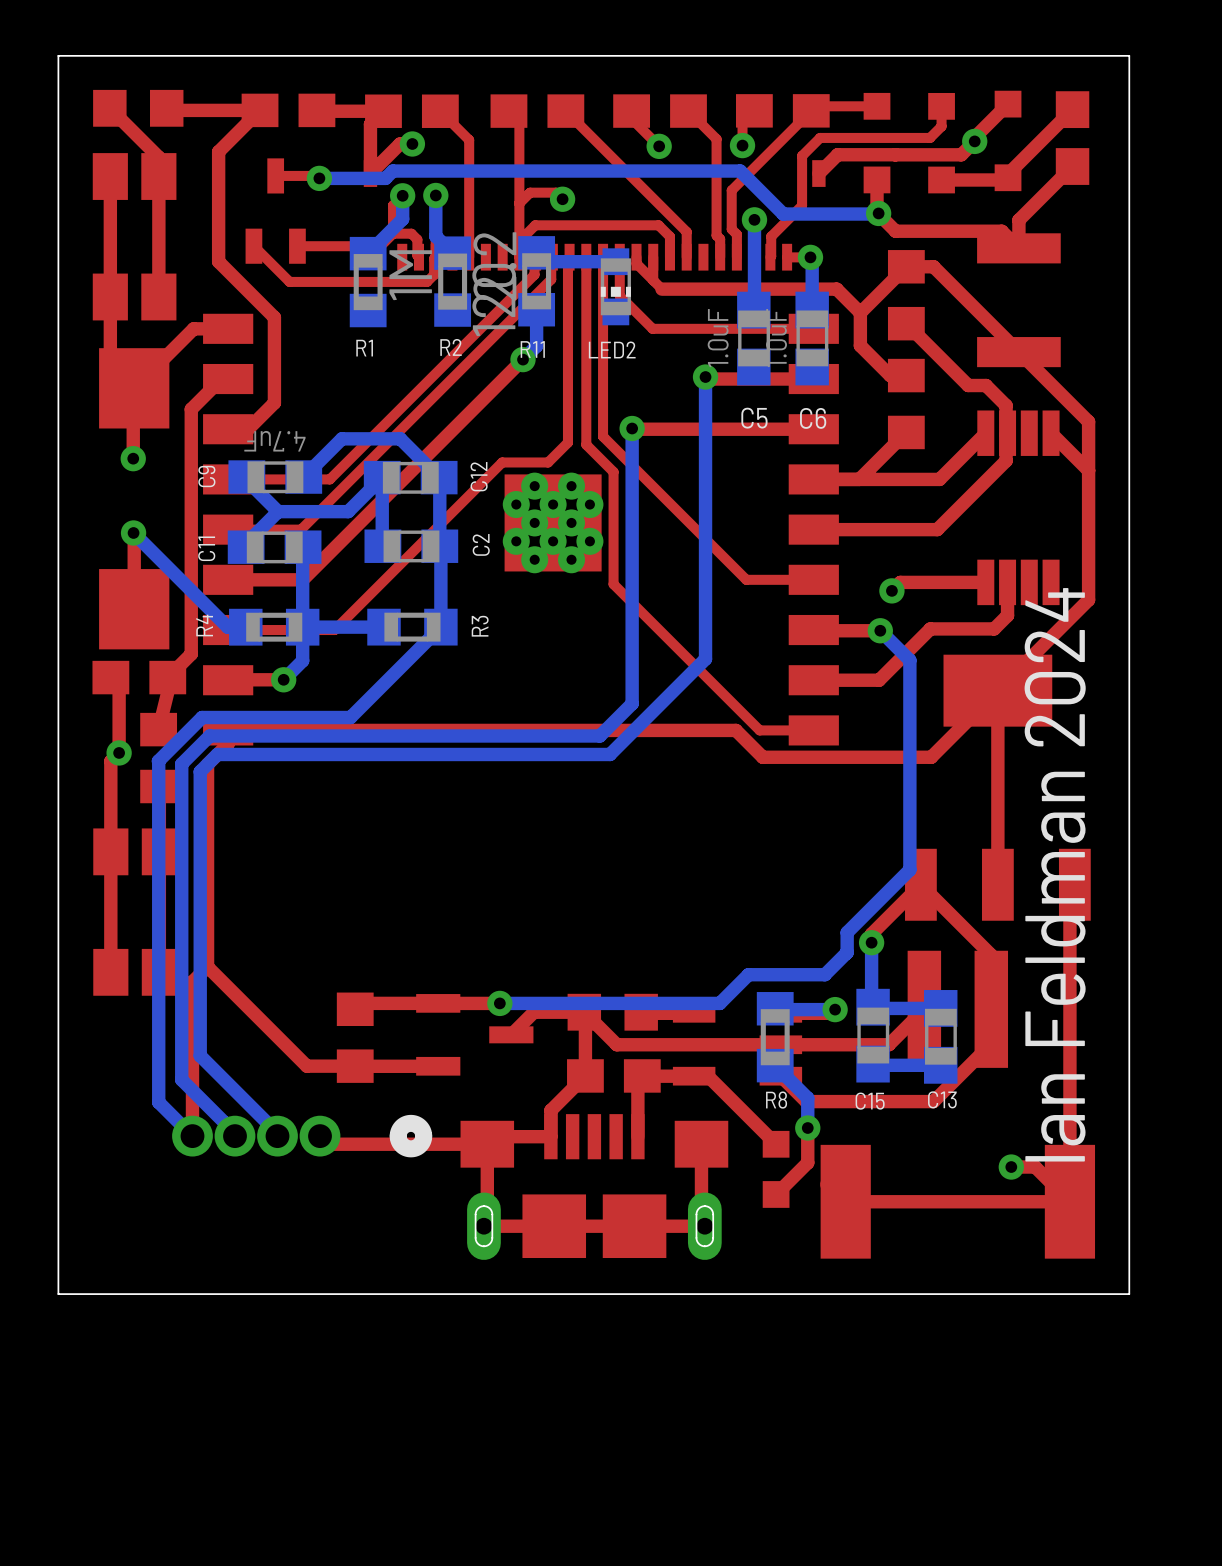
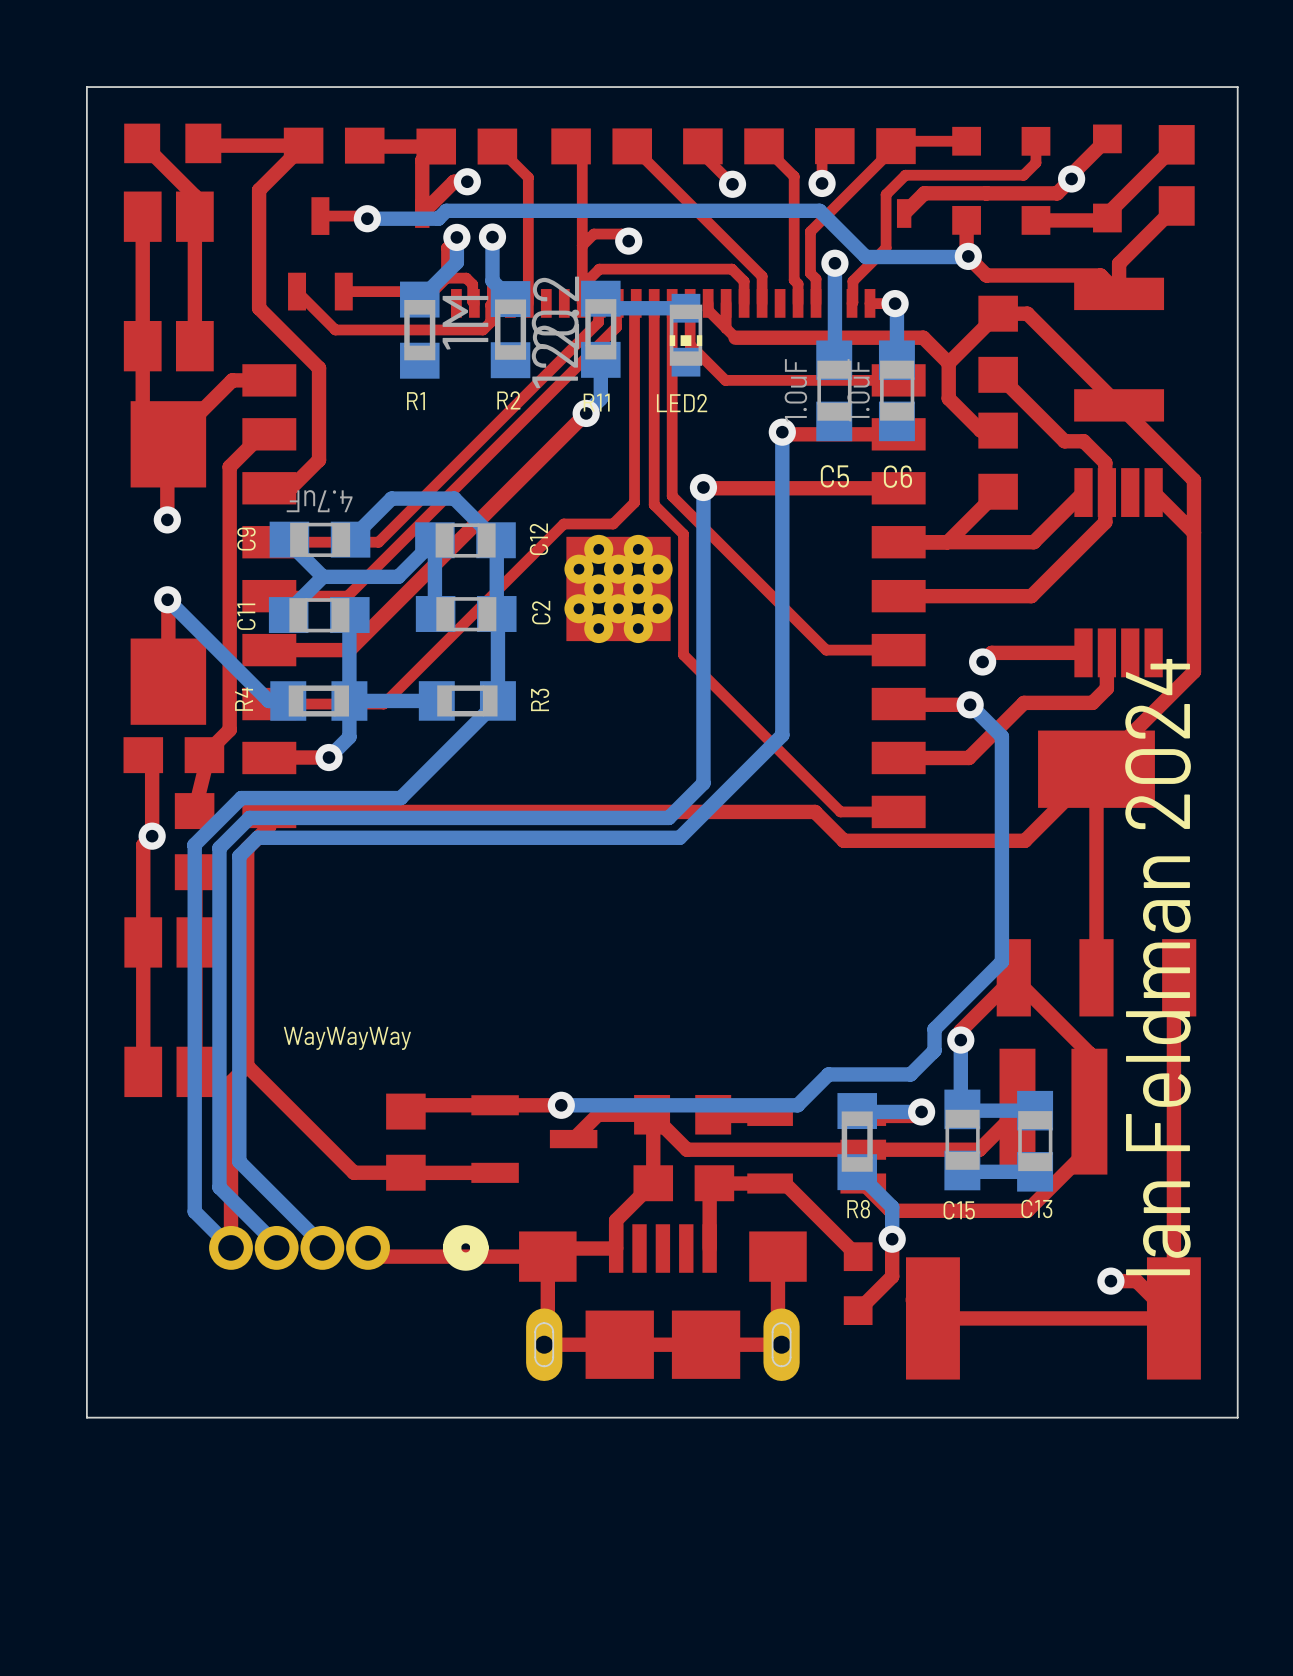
text: none -> WayWayWay (347, 1038)

